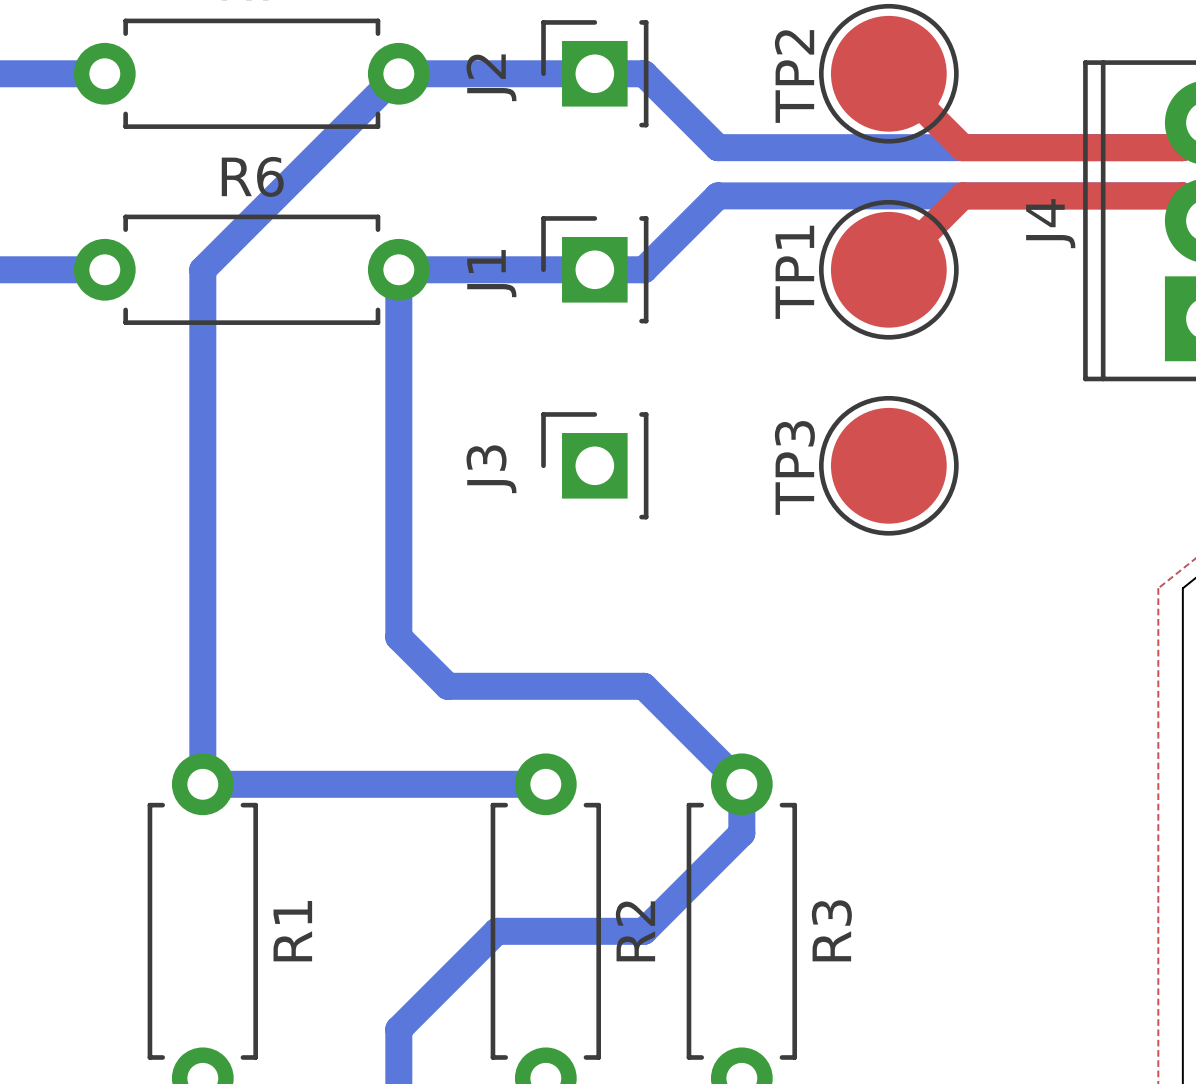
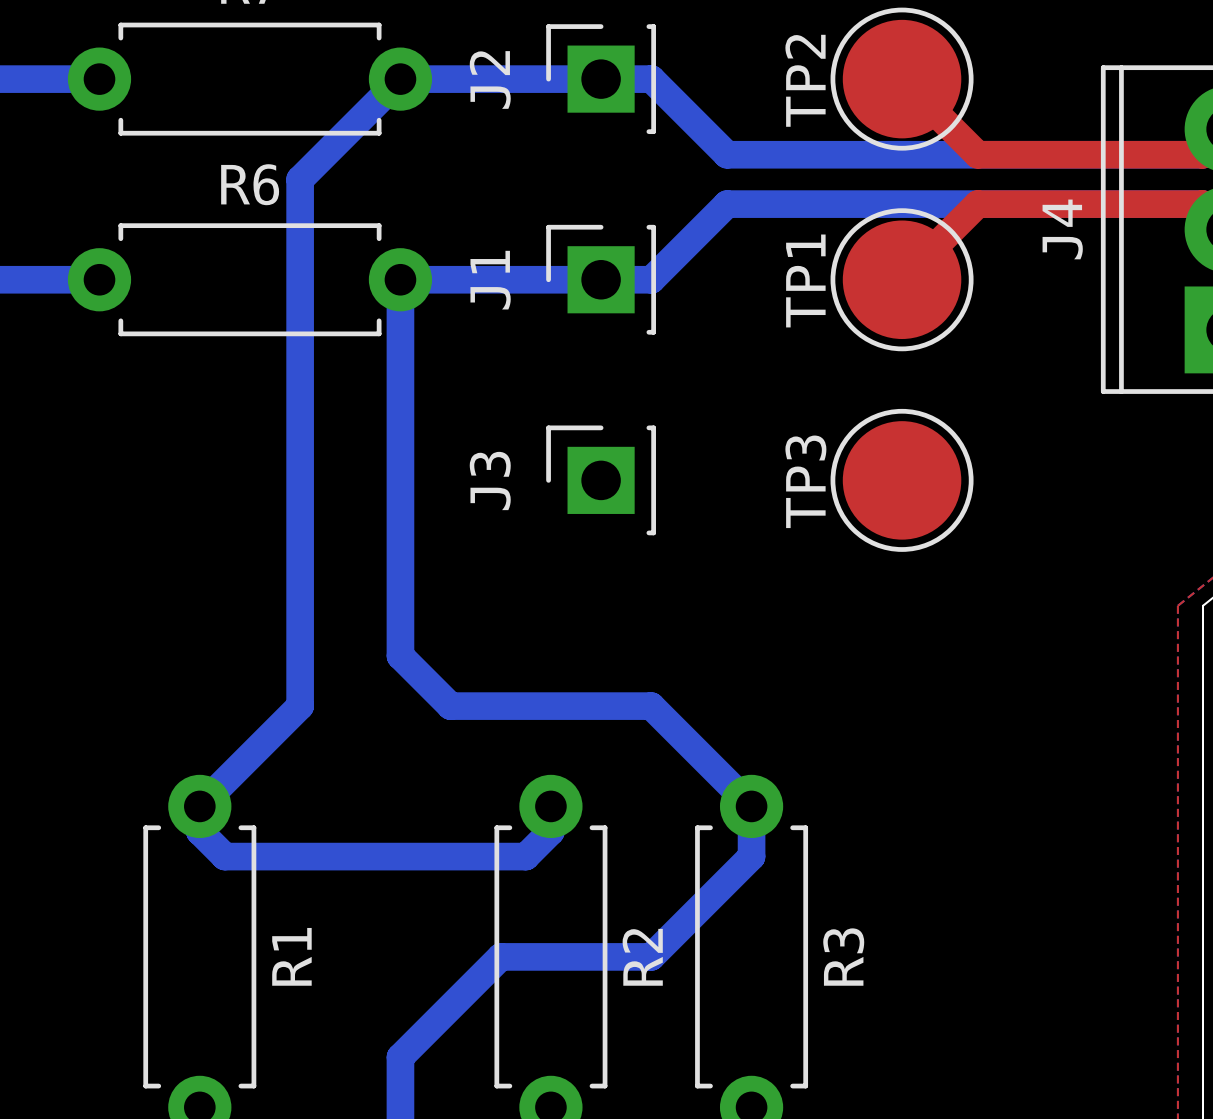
bottom track: (300, 171) (202, 269) (202, 784) (545, 784) -> (300, 179) (300, 706) (199, 806) (199, 831) (224, 856) (525, 856) (550, 831) (550, 806)

